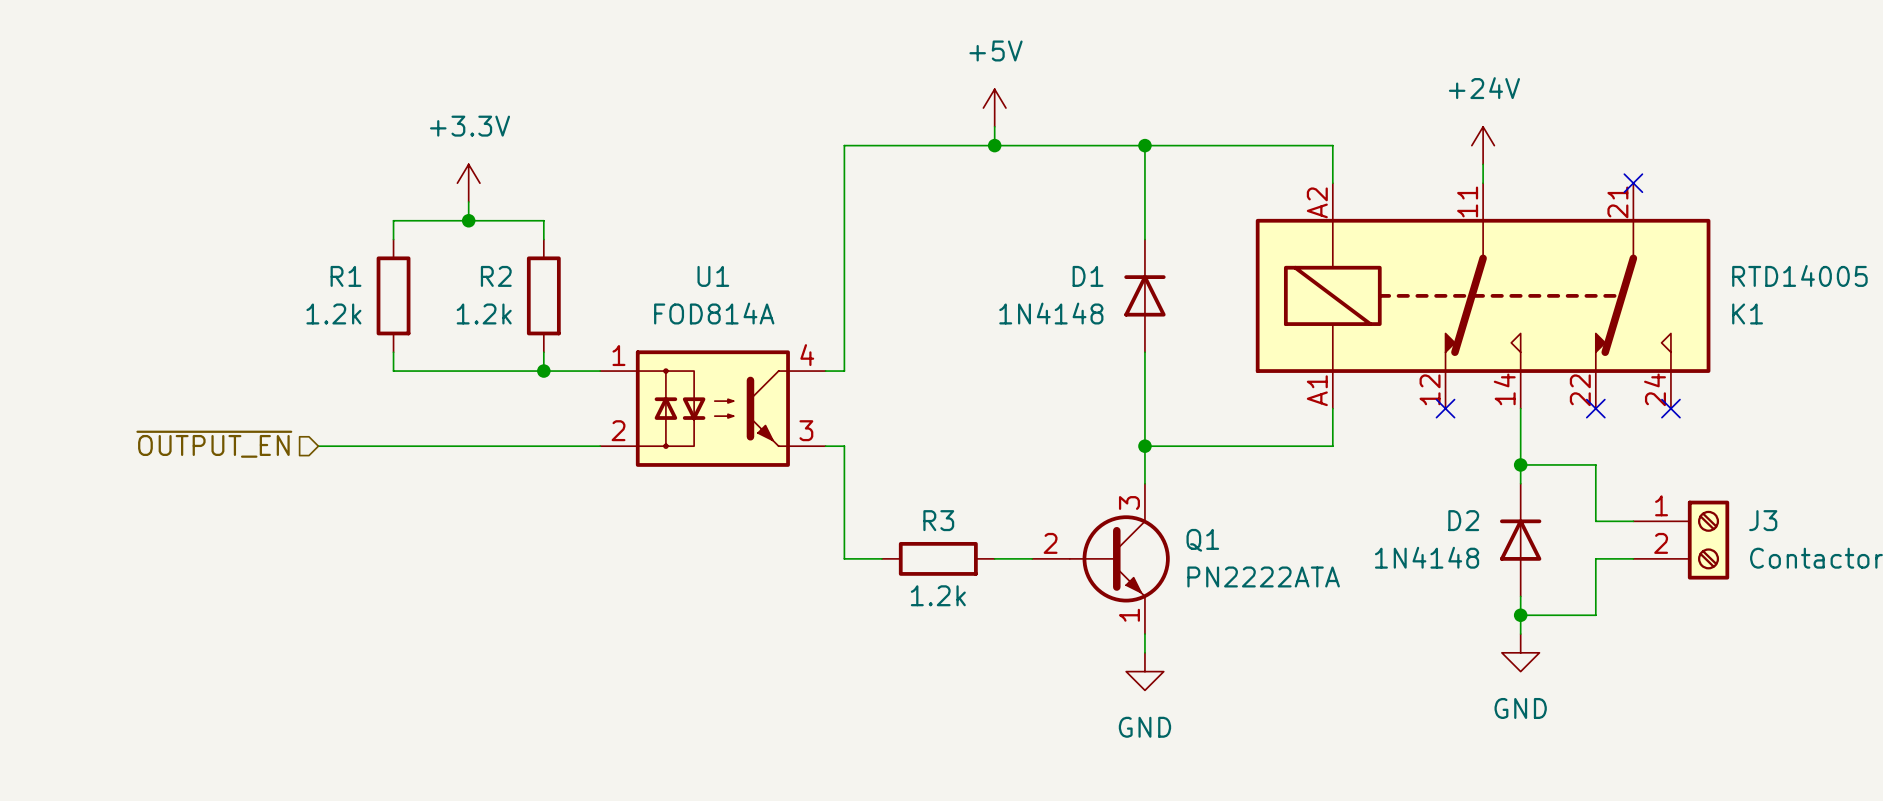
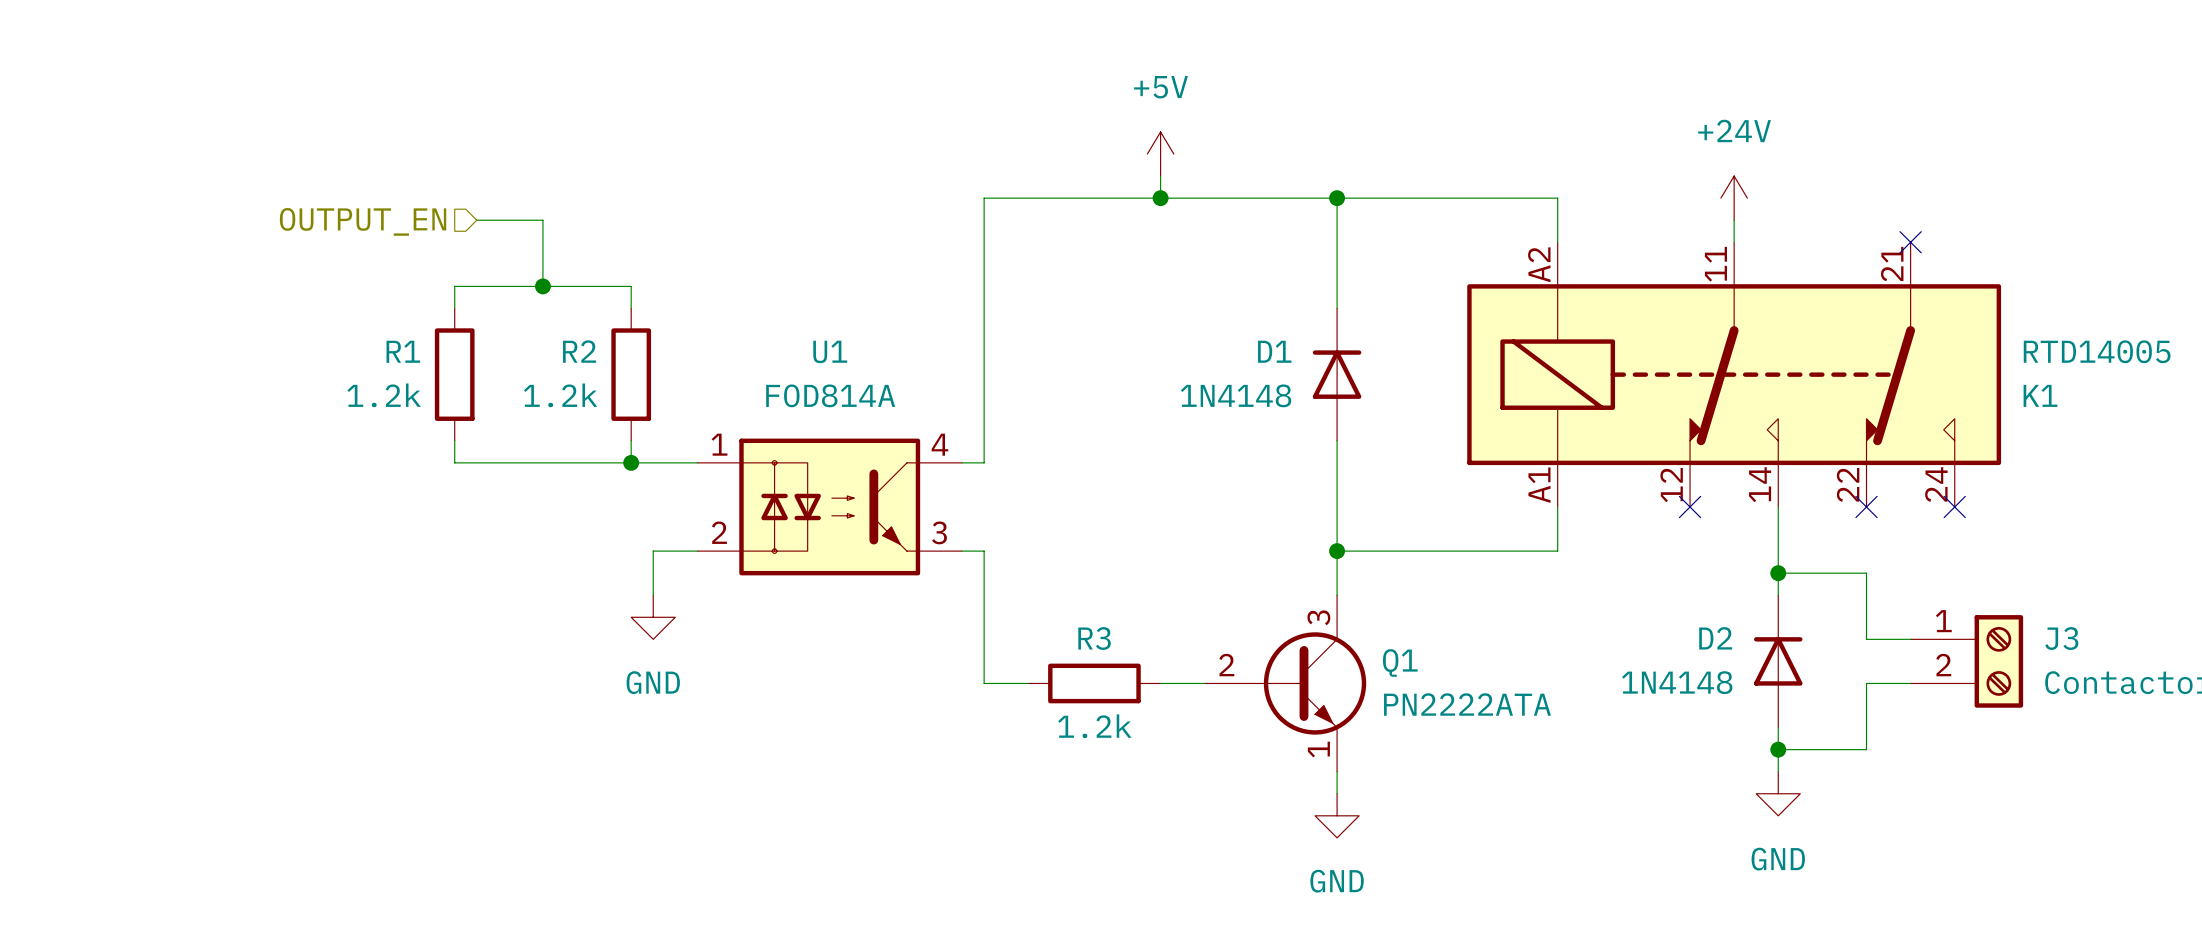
hierarchical label: none -> OUTPUT_EN (363, 221)
wire: none -> (476, 220) (542, 220) (542, 264)
power symbol: +3.3V (468, 183) -> none
hierarchical label: ~{OUTPUT_EN} (214, 444) -> none
wire: (318, 446) (562, 446) -> (653, 595) (653, 551)
power symbol: none -> GND (653, 617)

